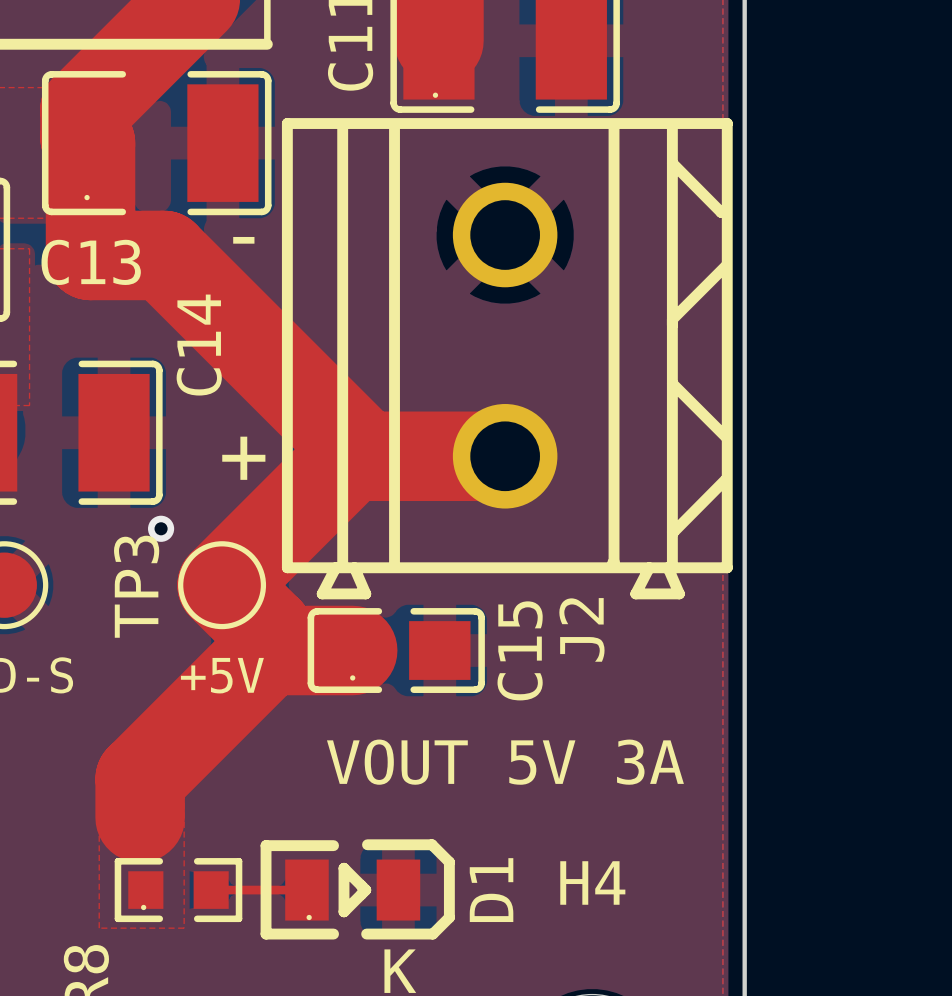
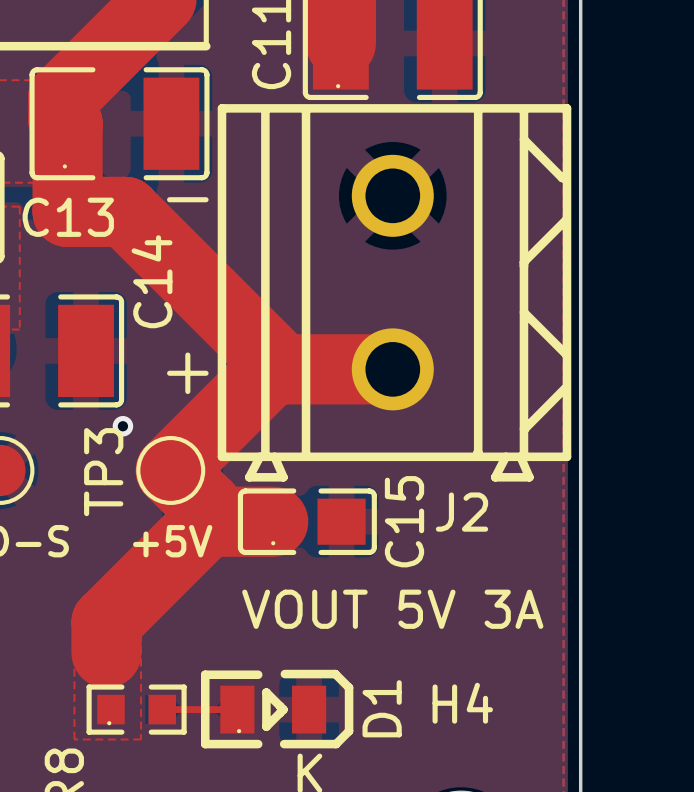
J2 name rotation: 0° (581, 629) -> 90° clockwise (462, 512)

